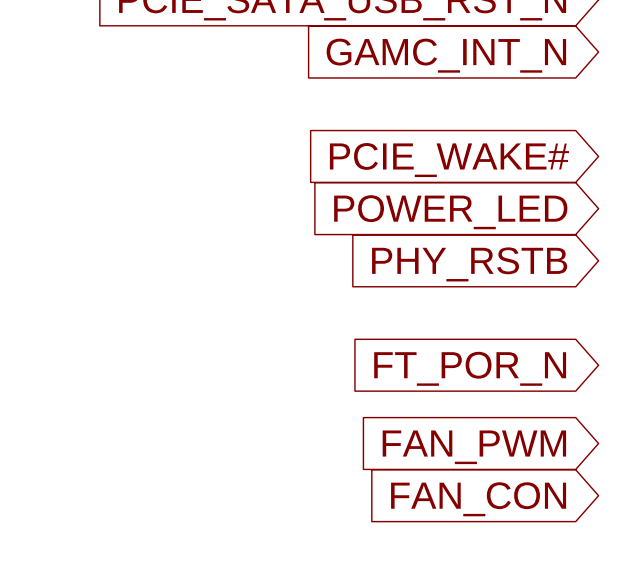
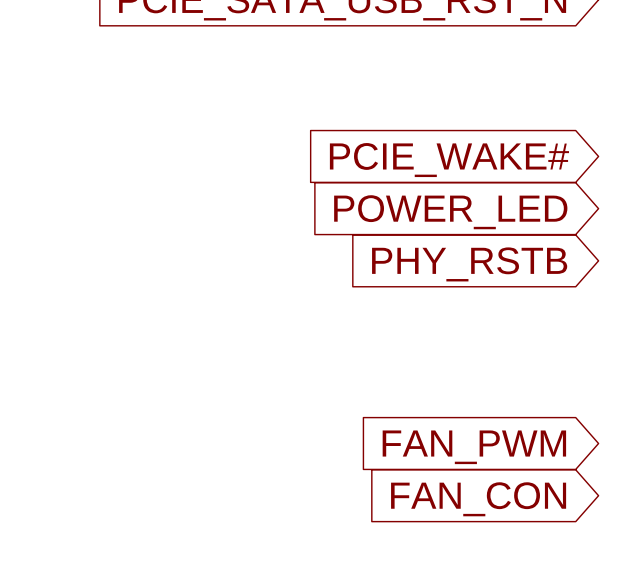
global label: GAMC_INT_N (446, 55) -> none
global label: FT_POR_N (470, 368) -> none

